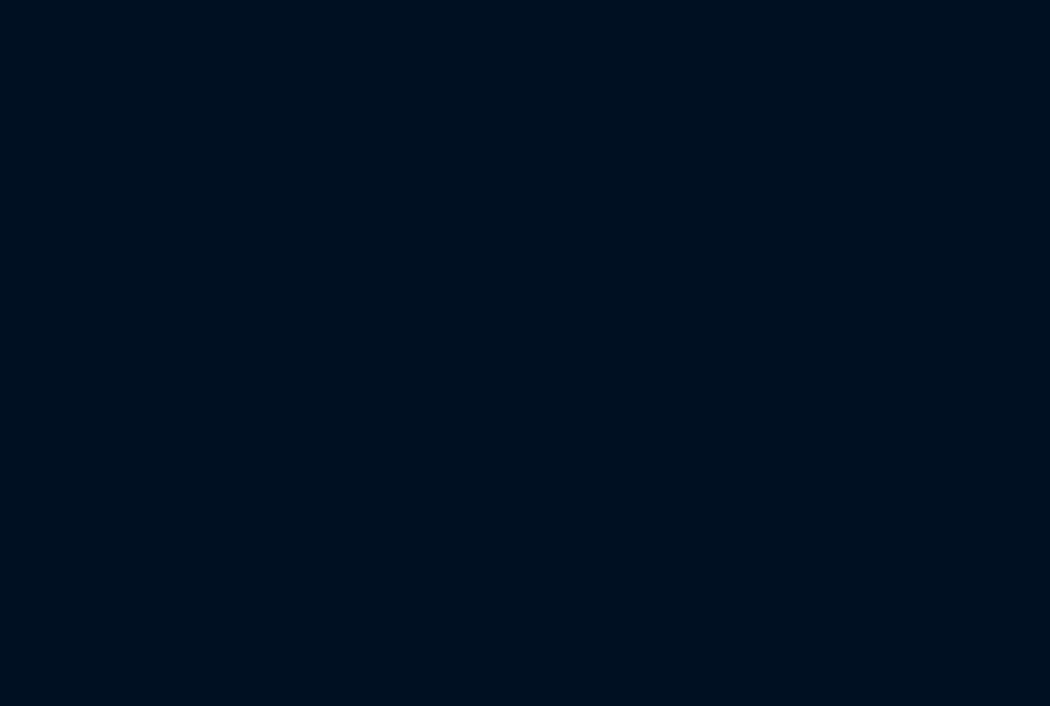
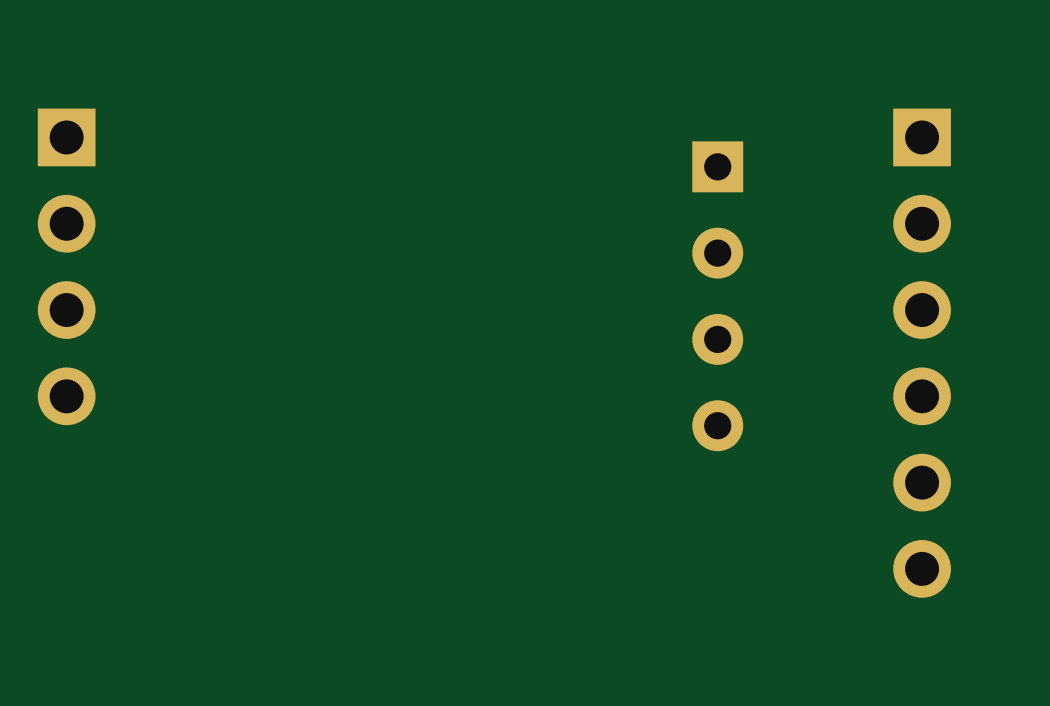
part: none -> (66, 266)
part: none -> (717, 296)
part: none -> (922, 353)

